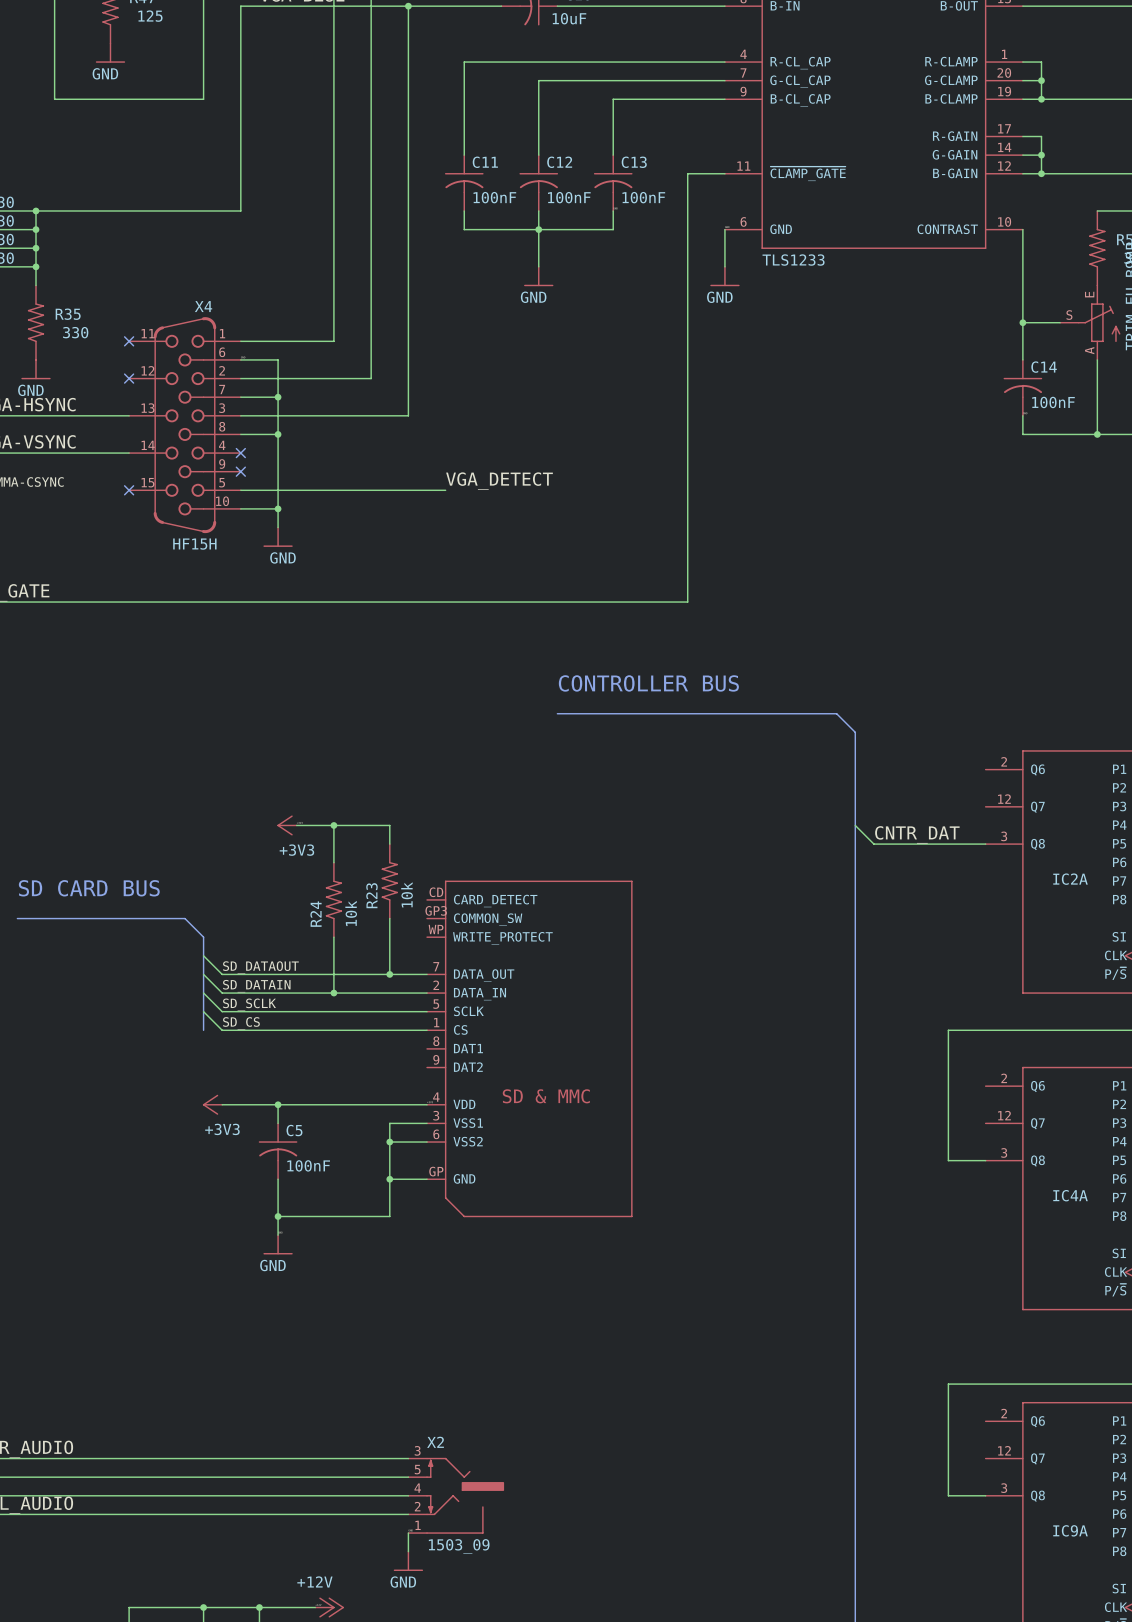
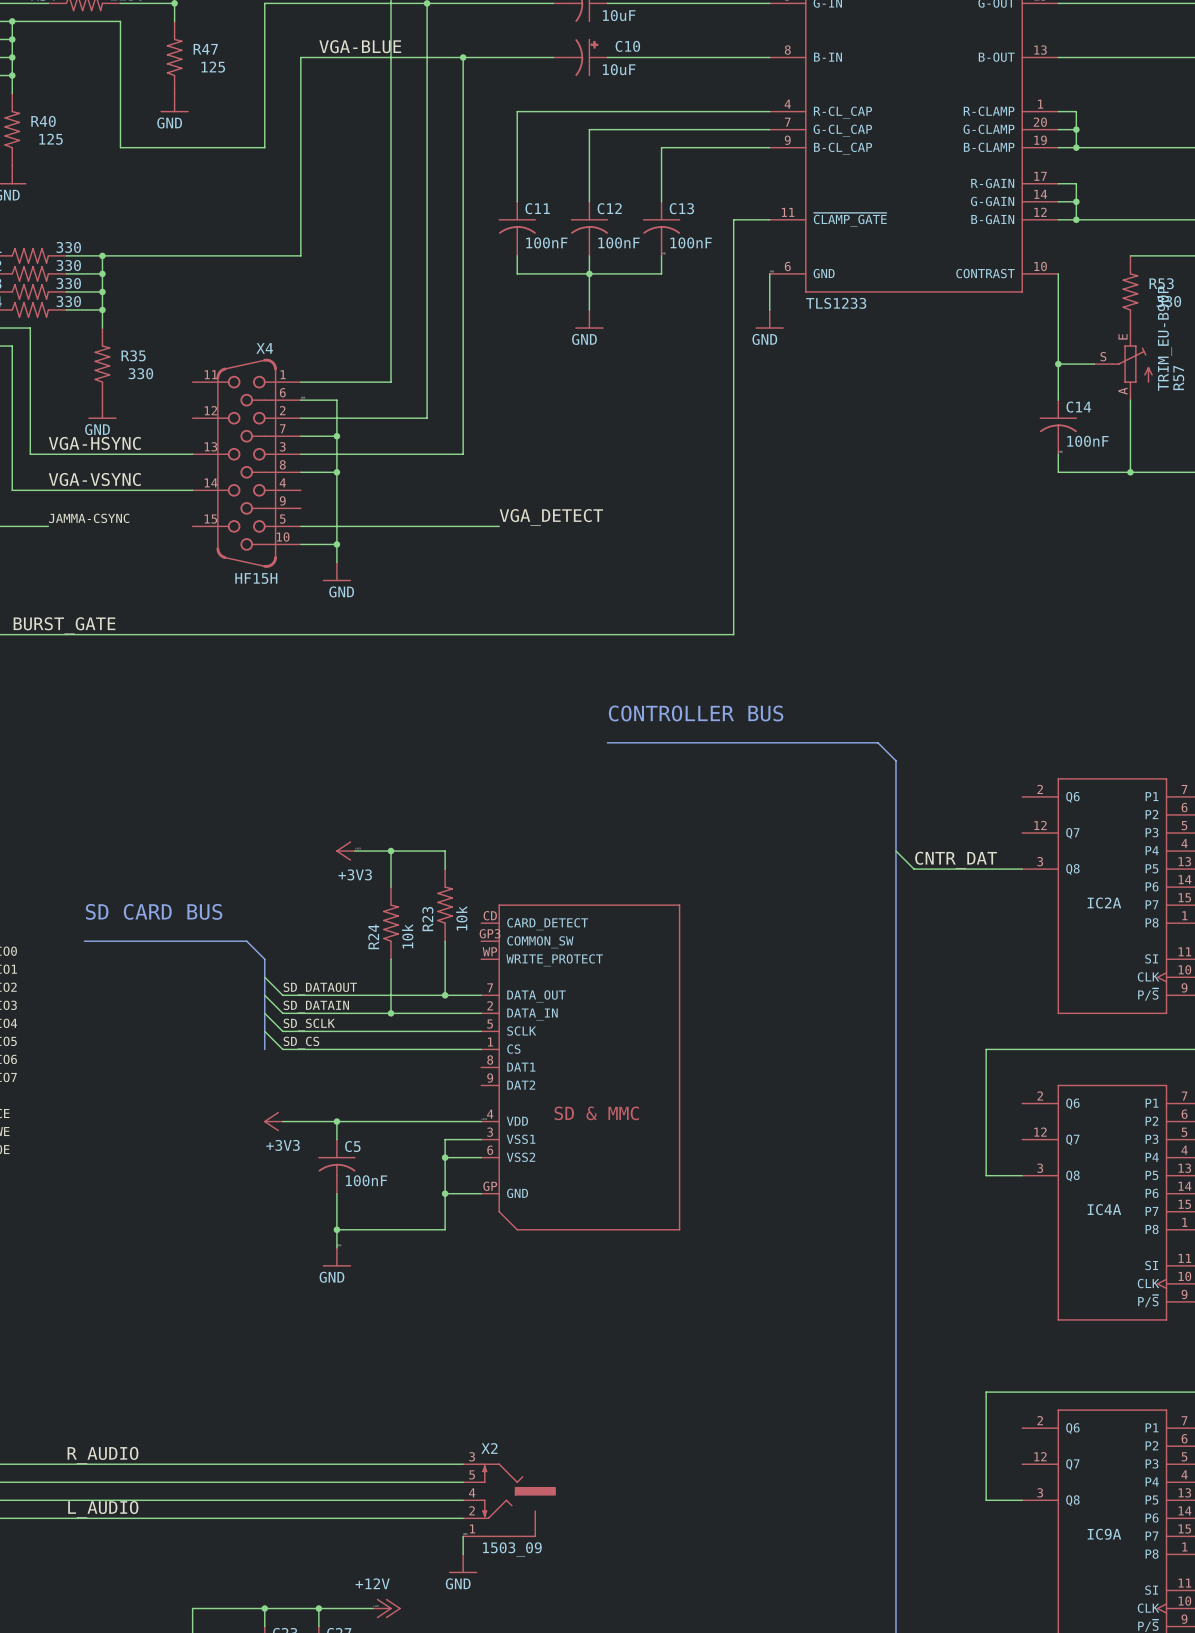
no-connect mark: (129, 341) -> none
no-connect mark: (129, 378) -> none
no-connect mark: (240, 453) -> none
no-connect mark: (240, 471) -> none
no-connect mark: (129, 490) -> none

